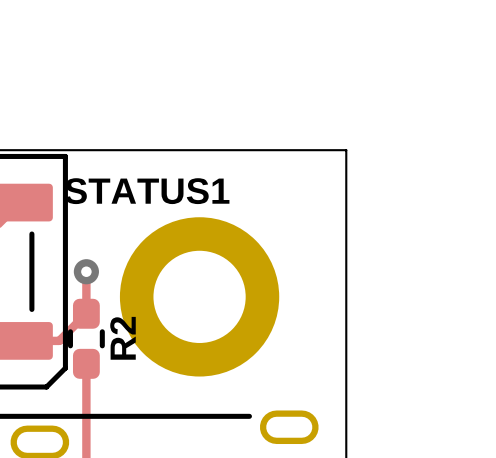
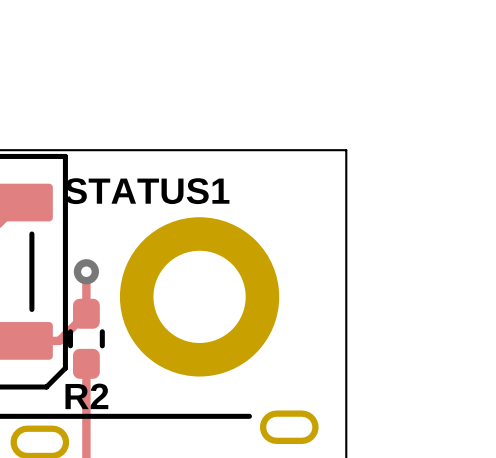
R2 name rotation: 0° (122, 338) -> 90° clockwise (86, 396)
R2 name position: R2 (122, 338) -> R2 (86, 396)

